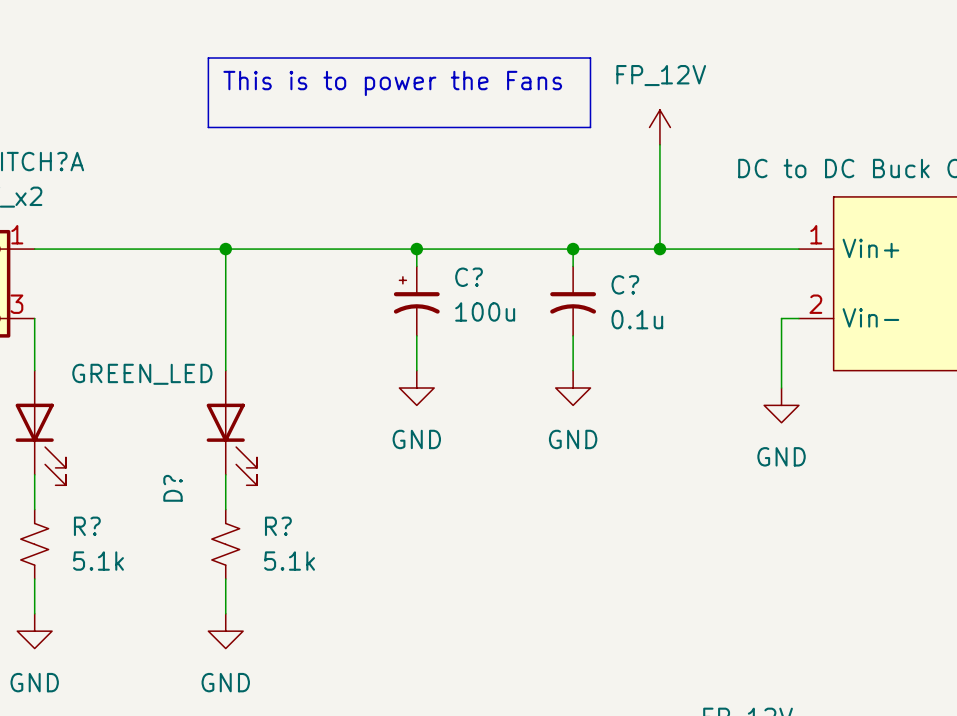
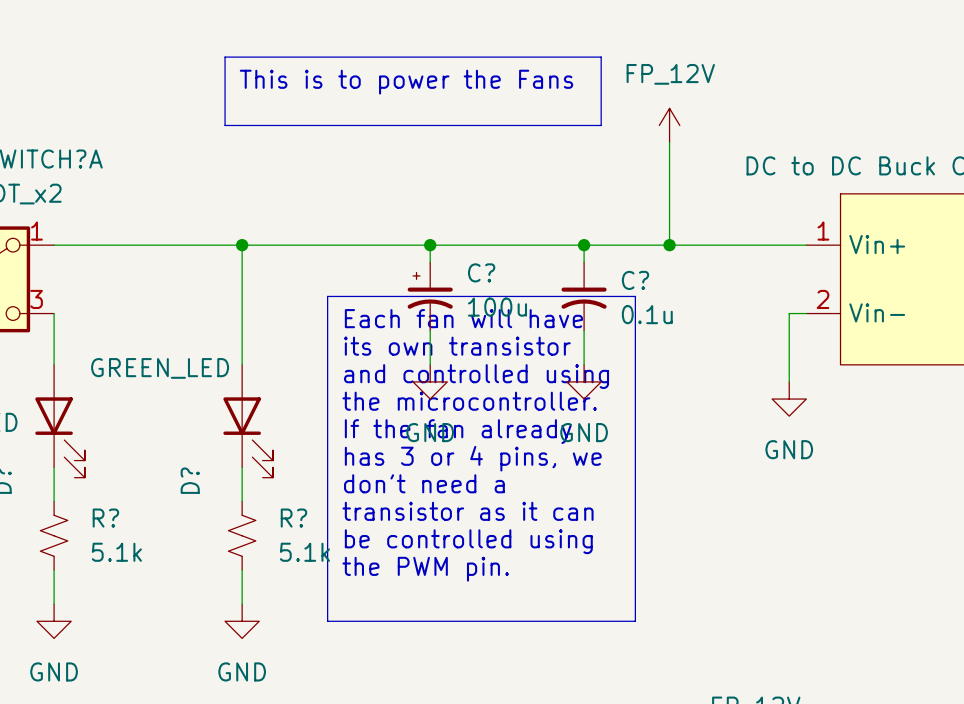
line: none -> (327, 296) (635, 296) (635, 621) (327, 621) (327, 296)
text: none -> Each fan will have (463, 318)
text: none -> its own transistor (457, 346)
text: none -> and controlled using (476, 376)
text: none -> the microcontroller. (469, 401)
text: none -> If the fan already (458, 431)
text: none -> has 3 or 4 pins, we (473, 458)
text: none -> don't need a (424, 483)
text: none -> transistor as it can (467, 511)
text: none -> be controlled using (468, 541)
text: none -> the PWM pin. (425, 569)

